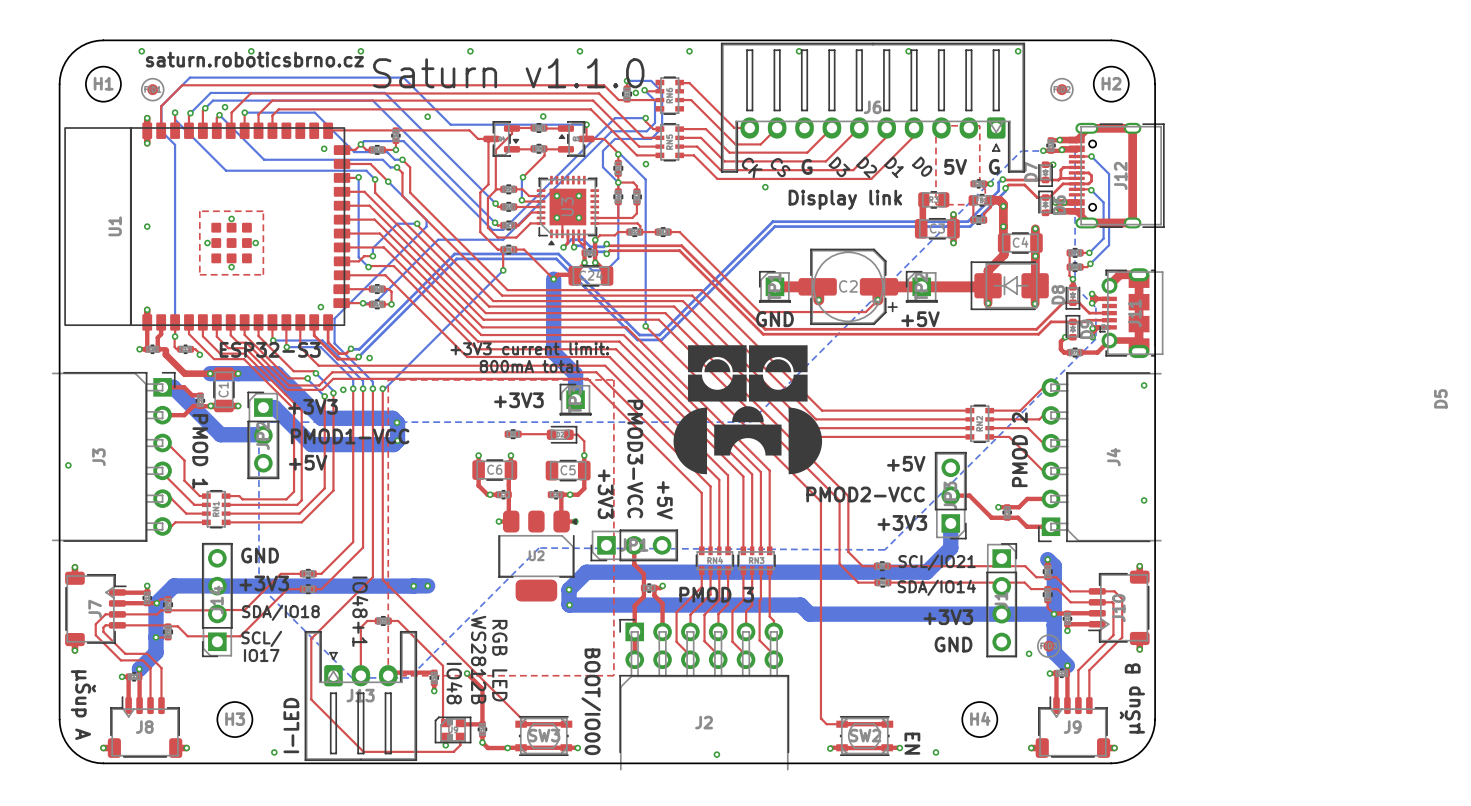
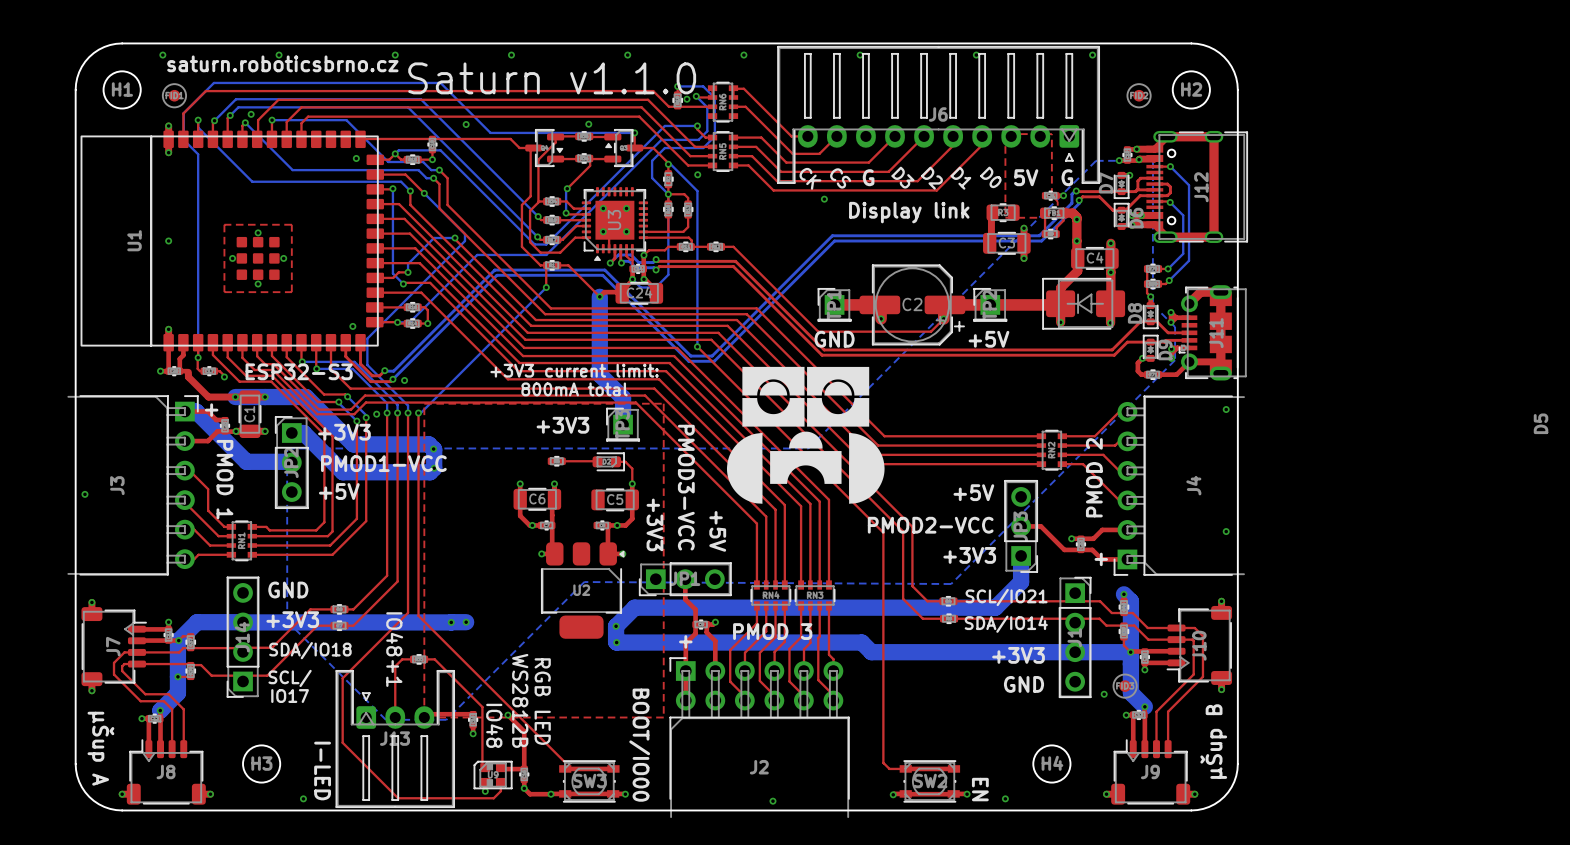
text: none -> + (211, 410)
text: none -> + (1101, 559)
text: none -> + (685, 641)
text rotation: 0° (291, 725) -> 180° (322, 771)

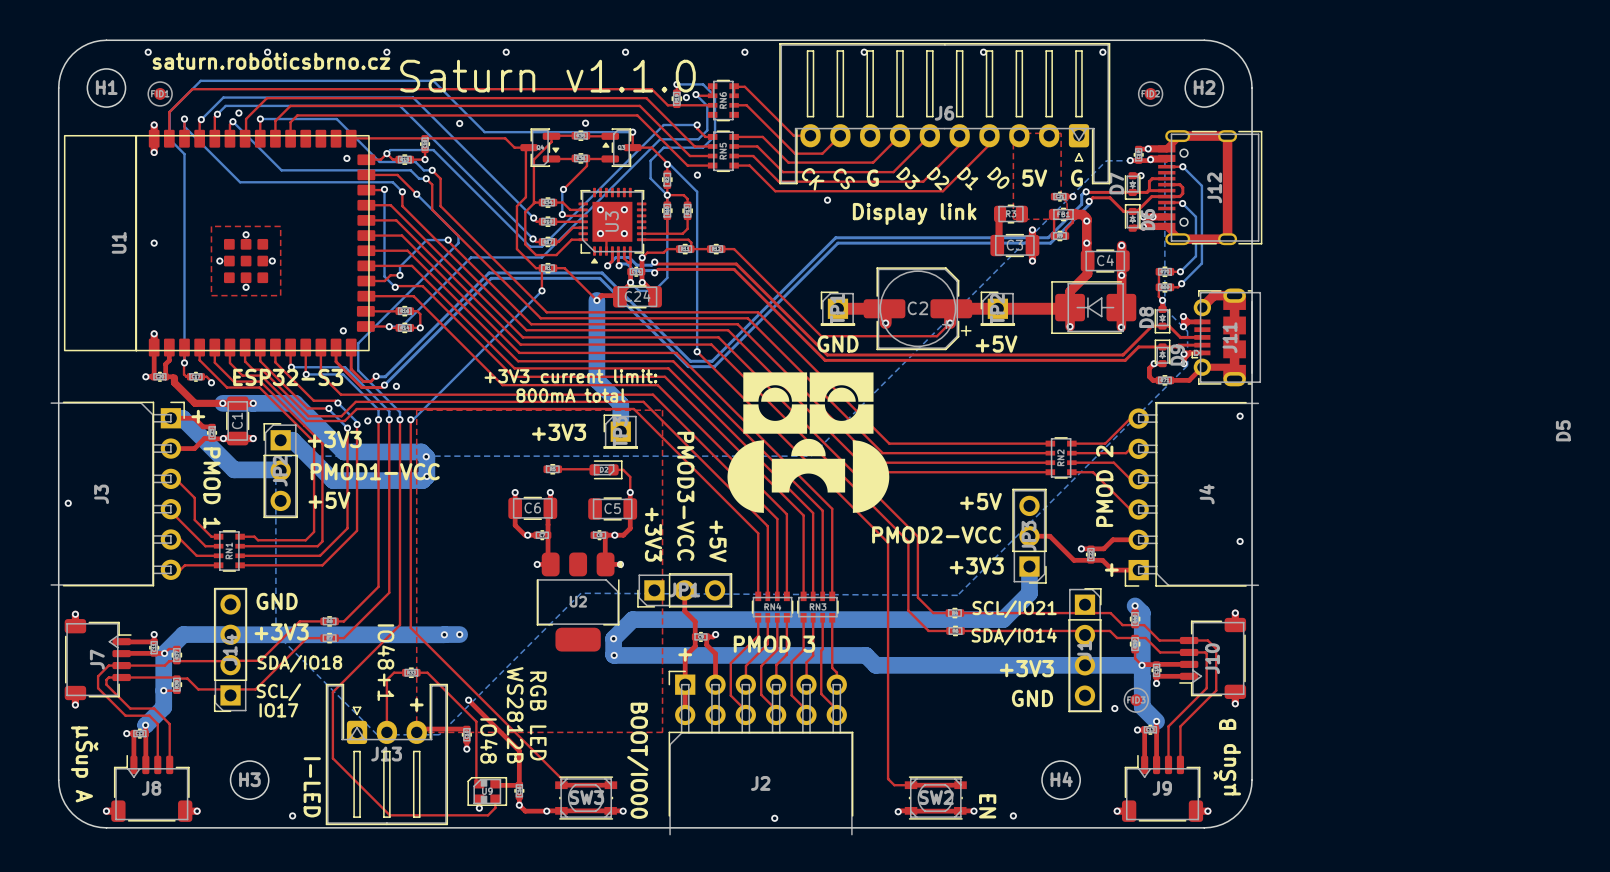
text: none -> + (416, 704)
top track: (507, 715) (524, 731) (524, 735) -> (468, 700) (519, 750)
via position: (507, 715) -> (468, 700)

